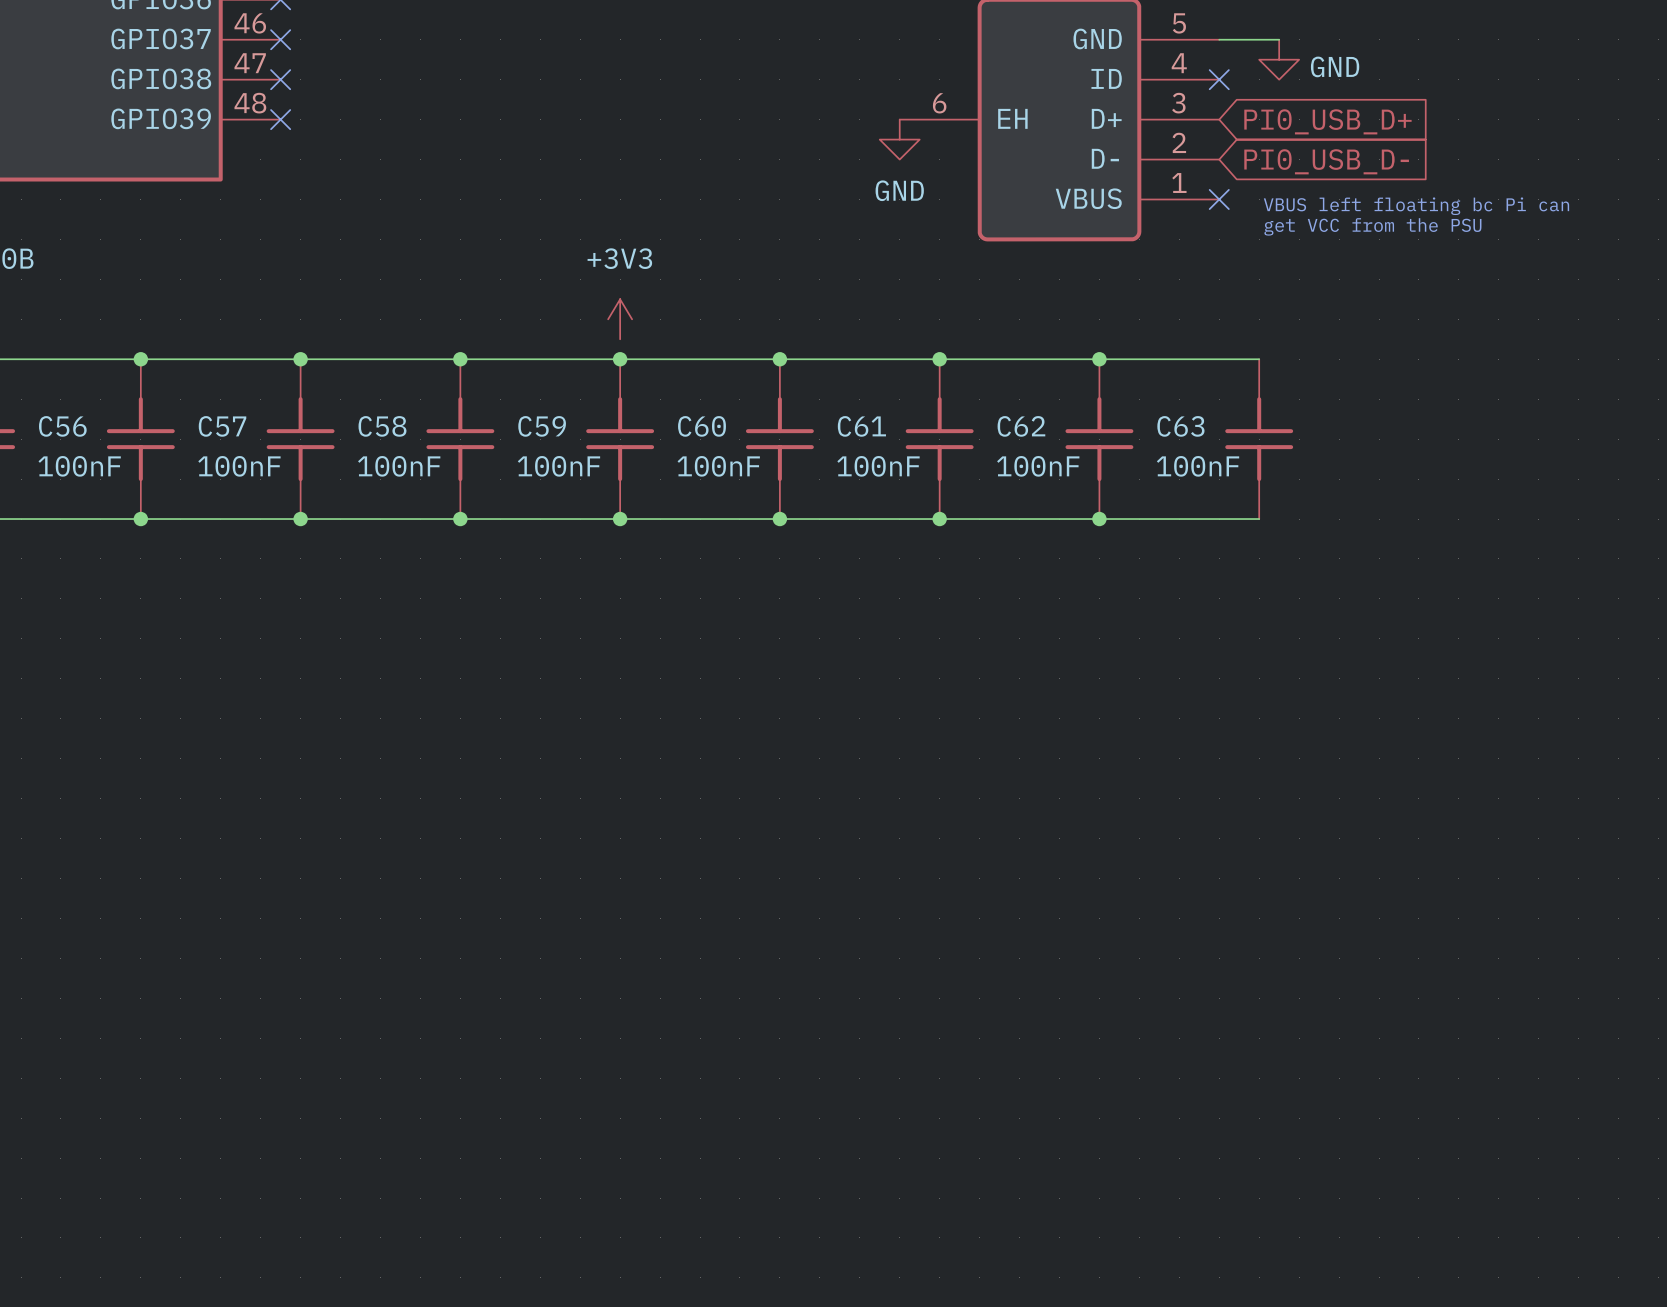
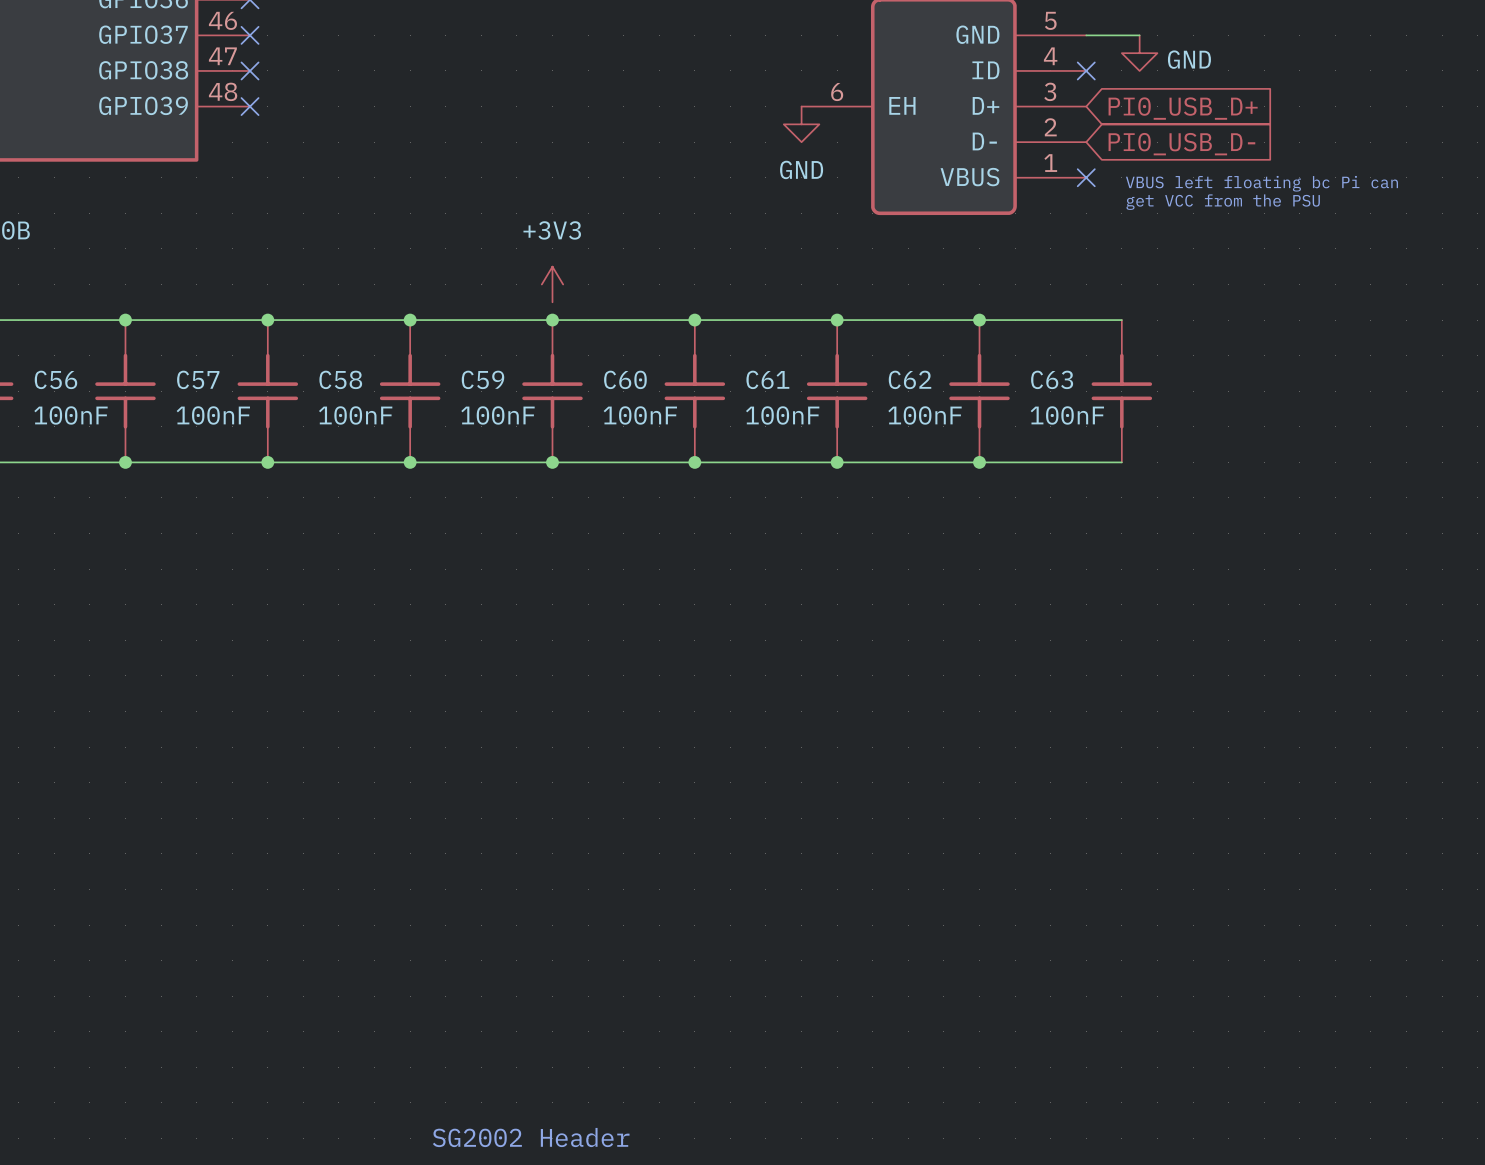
text: none -> SG2002 Header (531, 1137)

